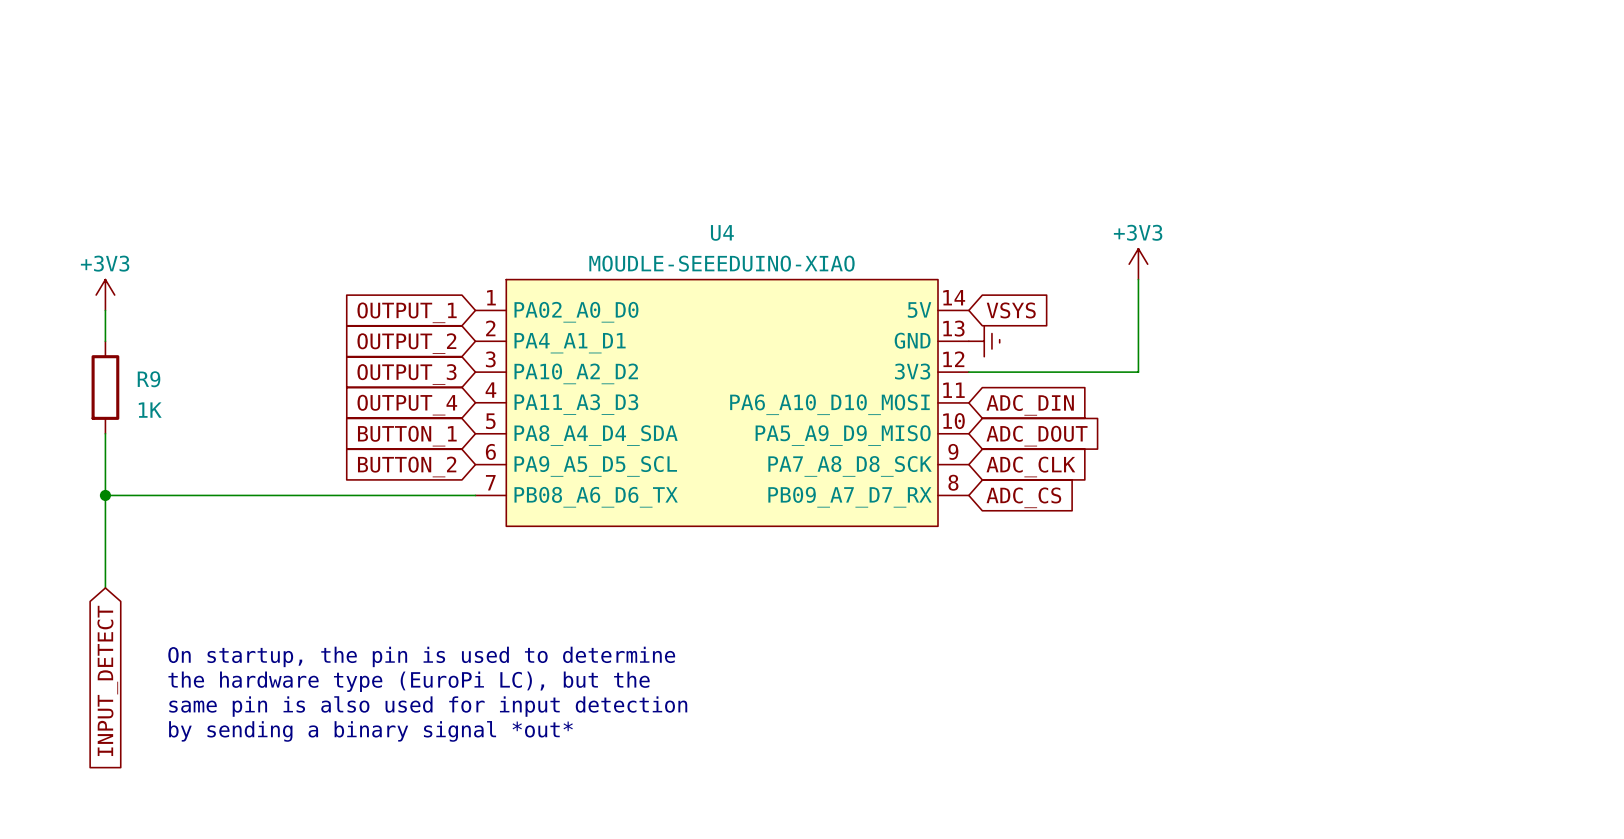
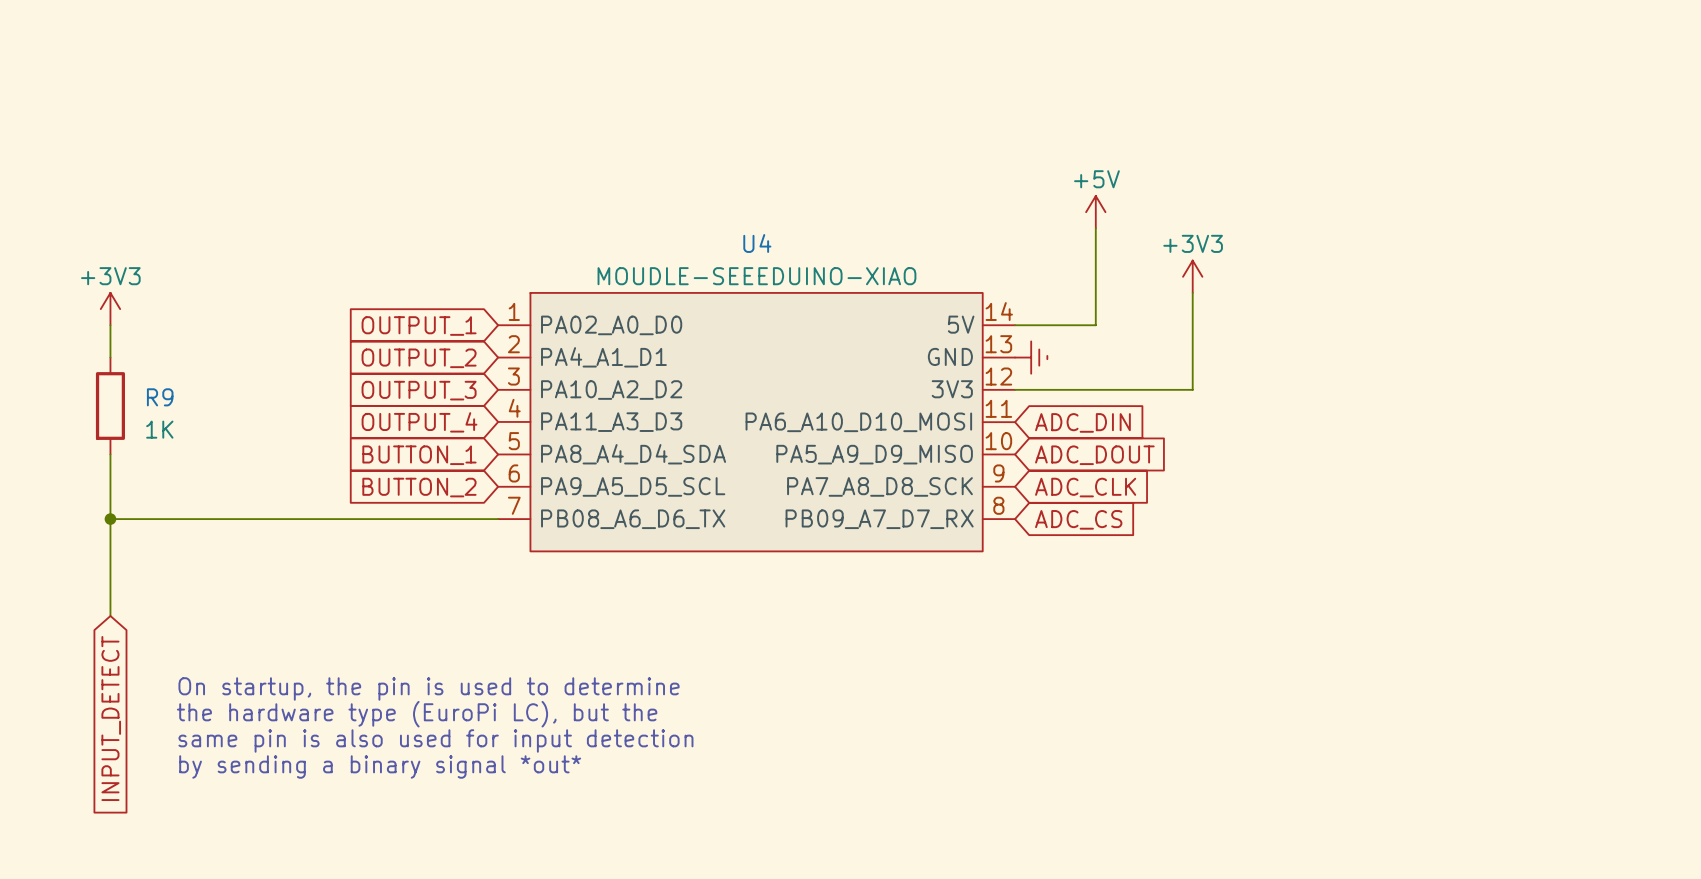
power symbol: none -> +5V (1095, 212)
wire: none -> (1095, 228) (1095, 325) (1015, 325)
global label: VSYS (1011, 310) -> none

